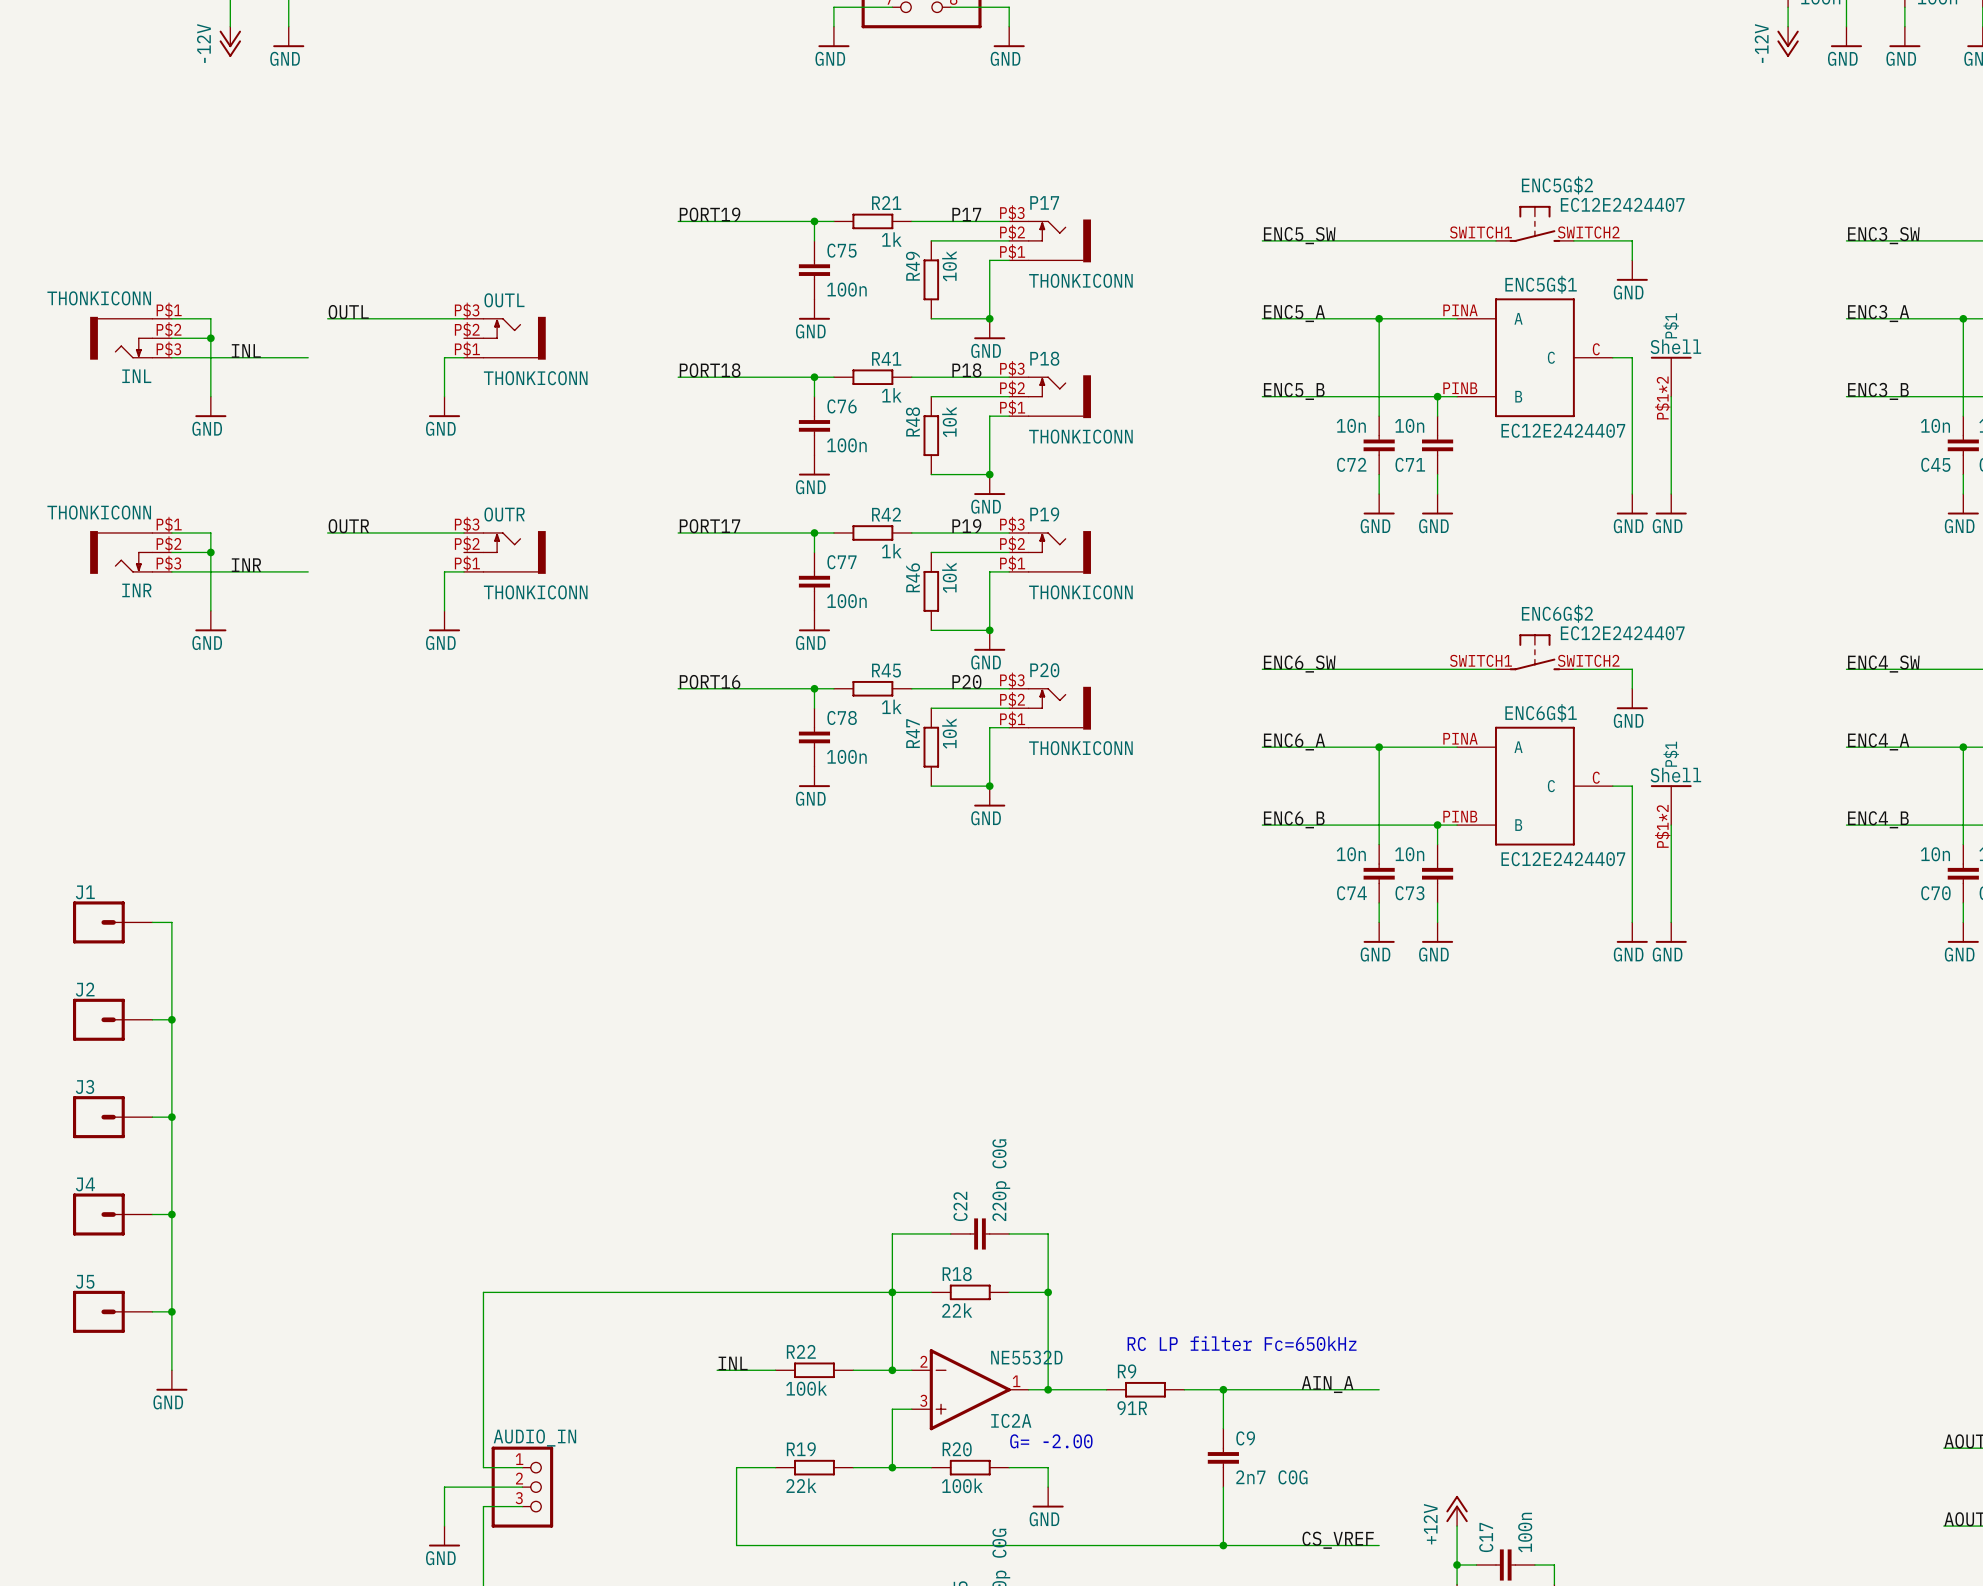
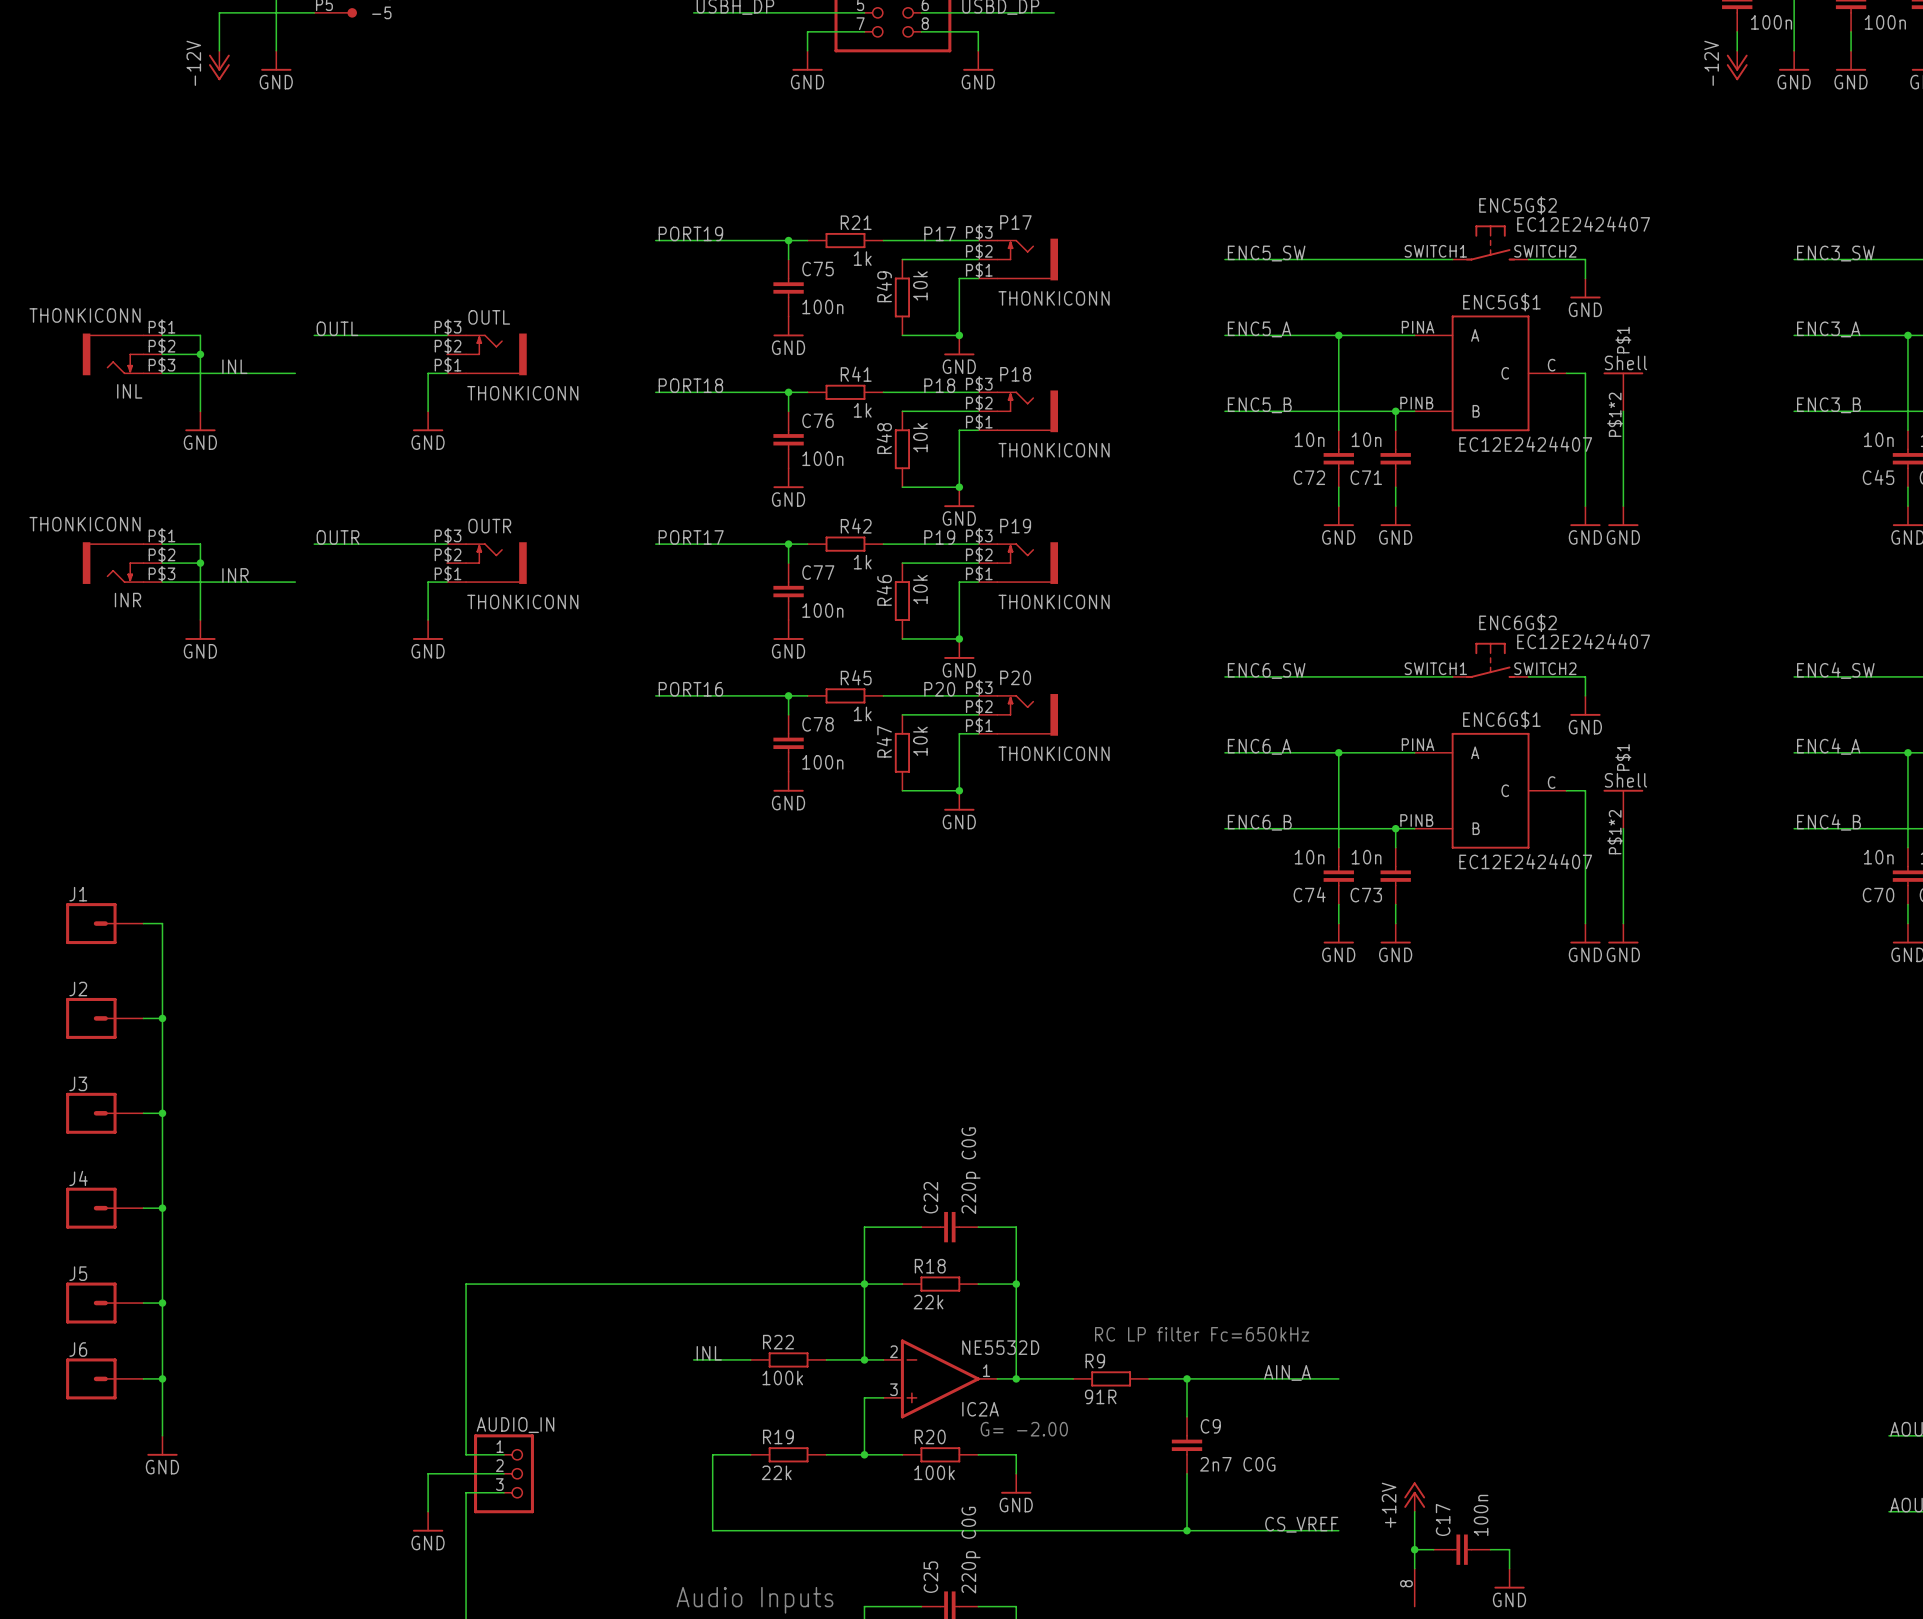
wire: none -> (162, 1359) (162, 1435)
power symbol position: GND (171, 1380) -> GND (162, 1445)
J6: none -> (104, 1378)
junction: none -> (162, 1378)

